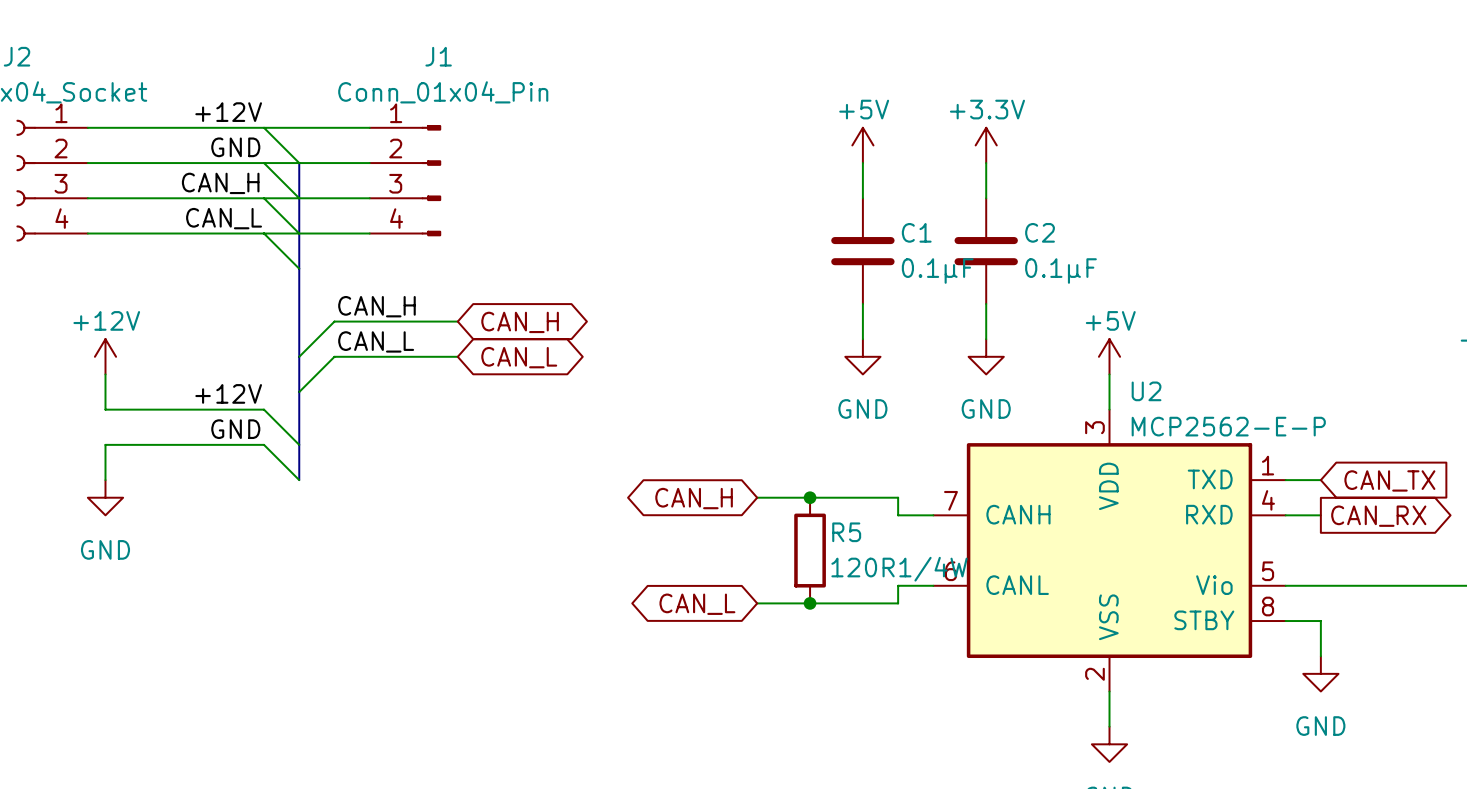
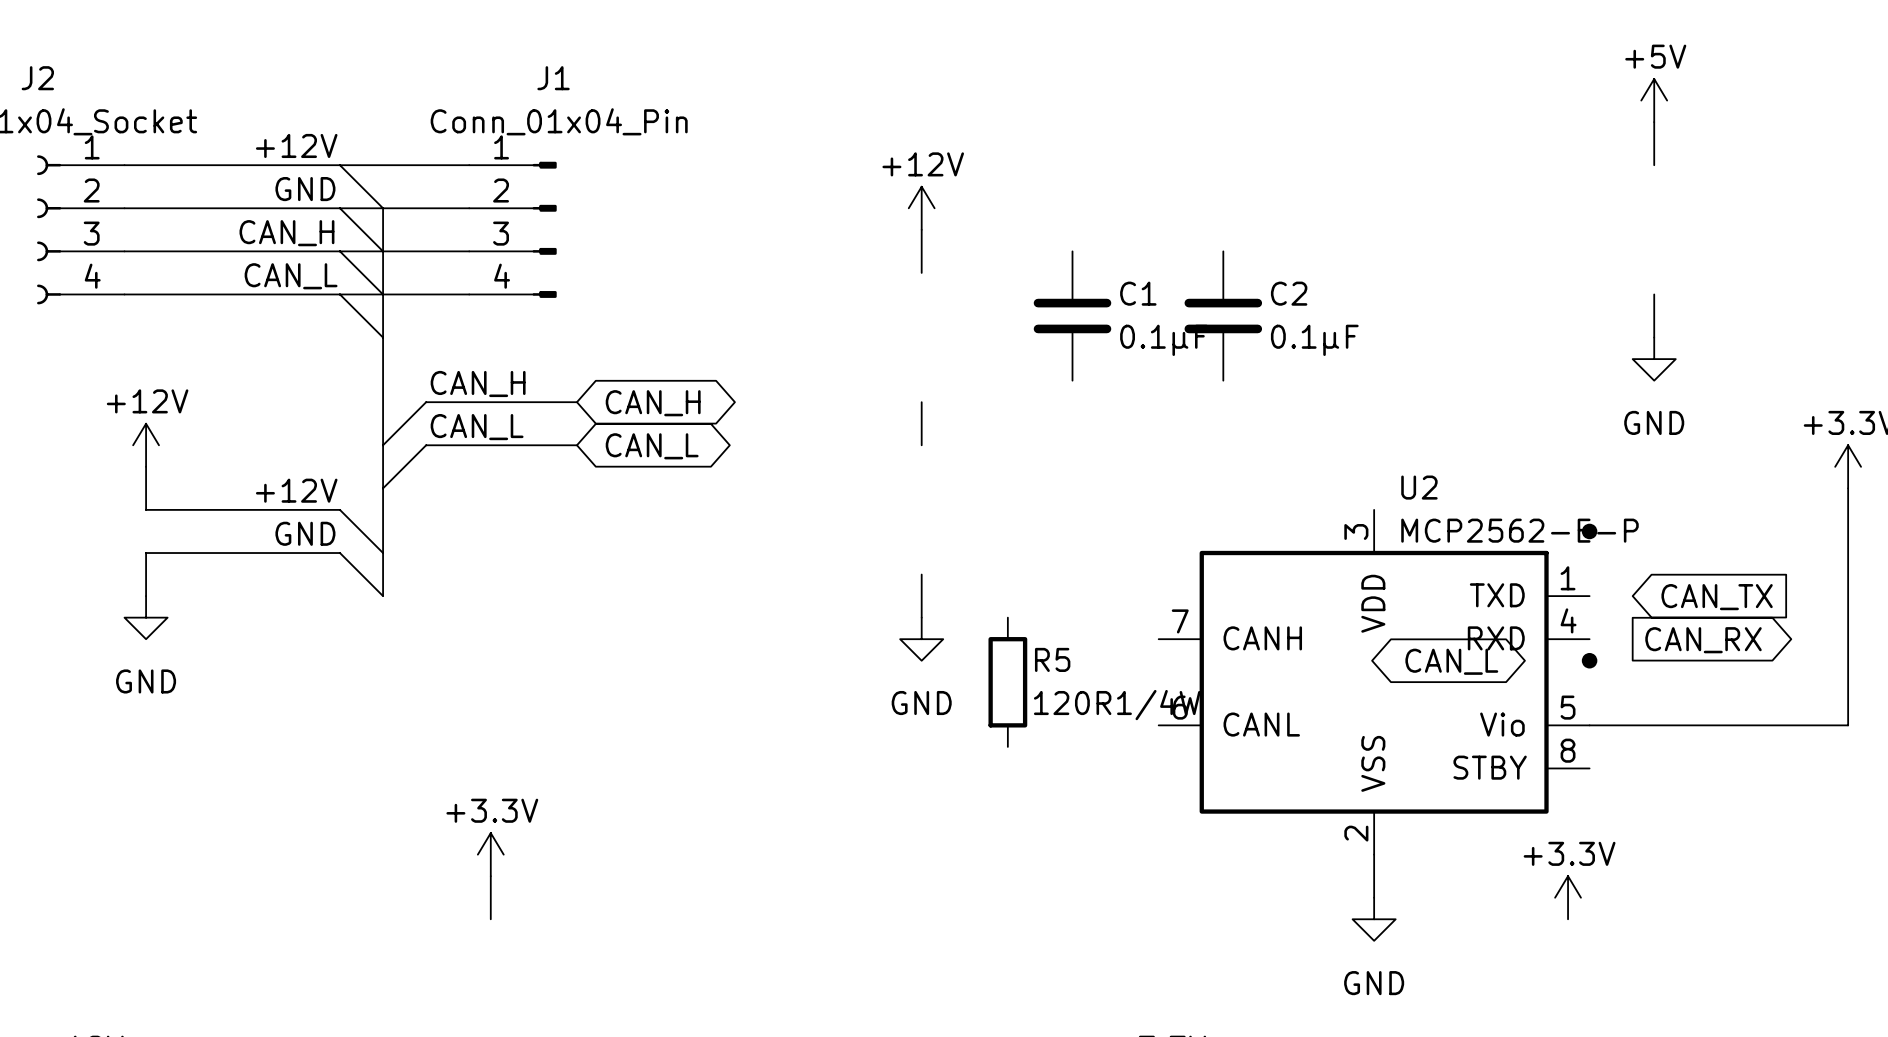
power symbol: none -> +5V (1654, 100)
wire: none -> (1654, 122) (1654, 165)
power symbol: +5V (862, 145) -> none
power symbol: +3.3V (986, 145) -> none
power symbol: none -> +12V (921, 208)
wire: (862, 163) (862, 198) -> (921, 229) (921, 272)
wire: (986, 163) (986, 198) -> none
power symbol: none -> GND (1654, 359)
wire: (862, 303) (862, 339) -> (921, 402) (921, 445)
wire: (986, 303) (986, 339) -> (921, 574) (921, 617)
power symbol: GND (862, 356) -> none
power symbol: GND (986, 356) -> none
power symbol: +5V (1109, 356) -> none
wire: (1109, 374) (1109, 409) -> (1654, 294) (1654, 337)
junction: none -> (1589, 531)
wire: (1285, 480) (1320, 480) -> none
wire: (757, 497) (898, 497) (898, 515) (933, 515) -> none
junction: (810, 497) -> none
global label: CAN_H (694, 498) -> none
power symbol: none -> GND (921, 639)
wire: (1285, 515) (1320, 515) -> none
junction: none -> (1589, 660)
global label: none -> CAN_L (1451, 661)
wire: (933, 585) (898, 585) (898, 603) (757, 603) -> none
junction: (810, 603) -> none
global label: CAN_L (697, 604) -> none
wire: (1285, 621) (1320, 621) (1320, 656) -> none
power symbol: GND (1320, 673) -> none
power symbol: none -> +3.3V (490, 854)
wire: none -> (490, 876) (490, 919)
power symbol: none -> +3.3V (1568, 897)

